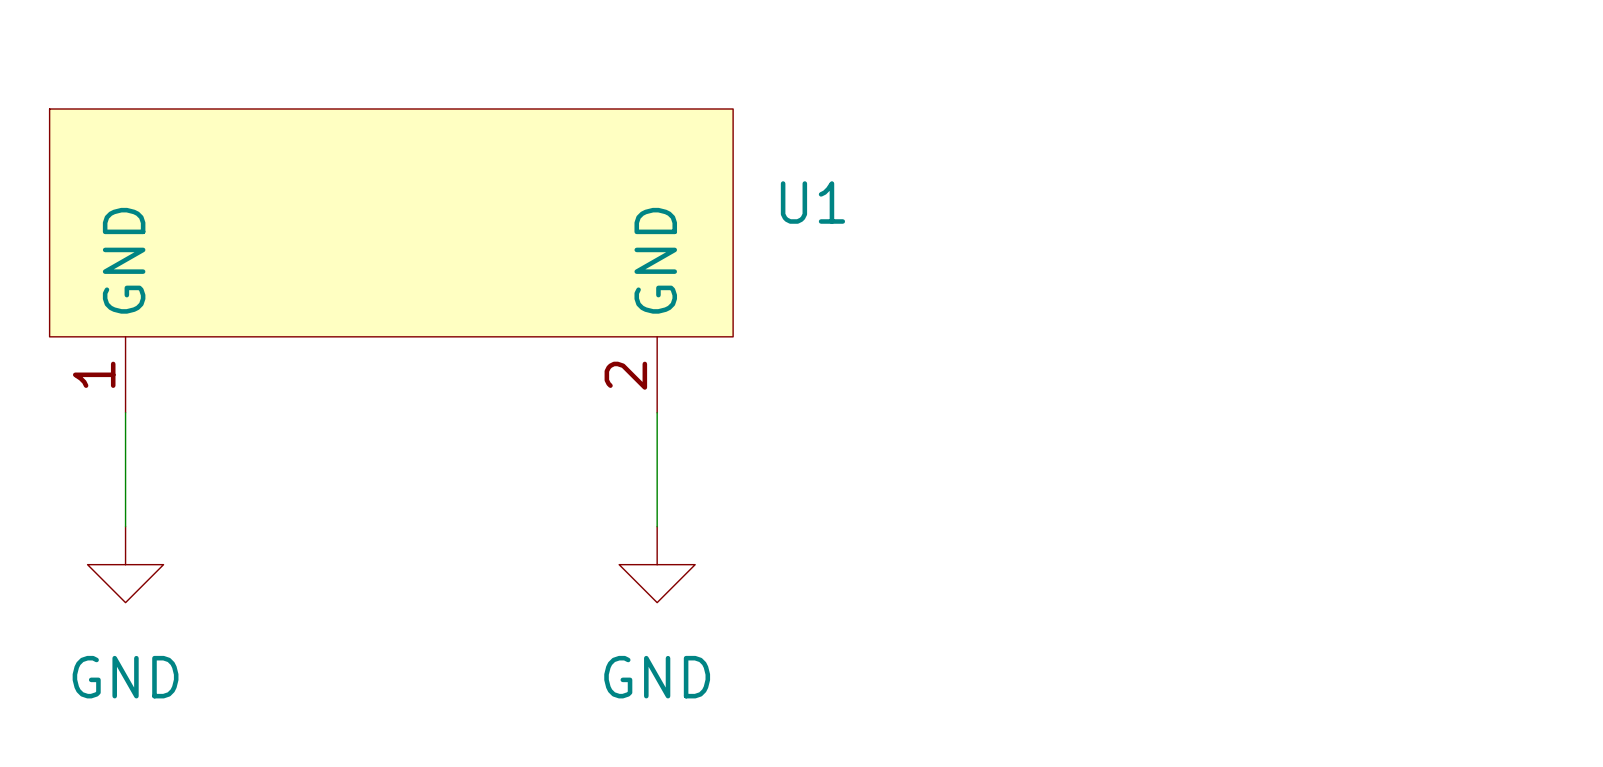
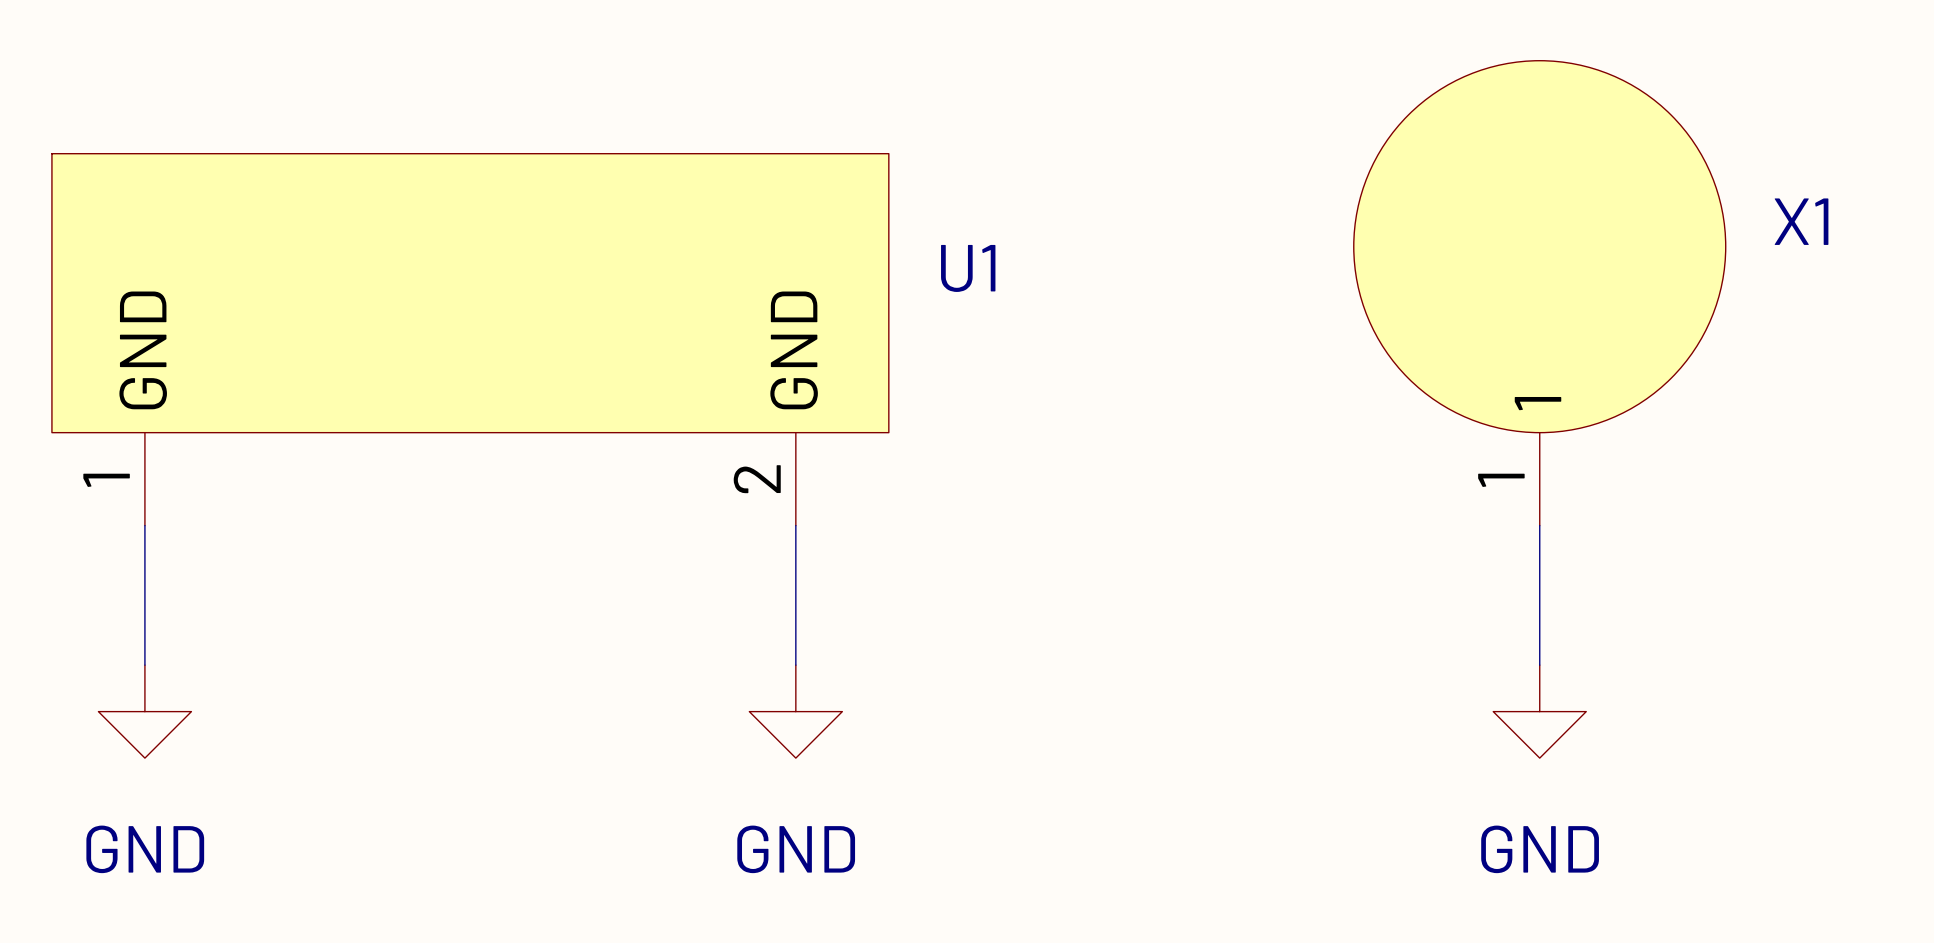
X1: none -> (1539, 293)
wire: none -> (1539, 525) (1539, 665)
power symbol: none -> GND (1539, 711)

